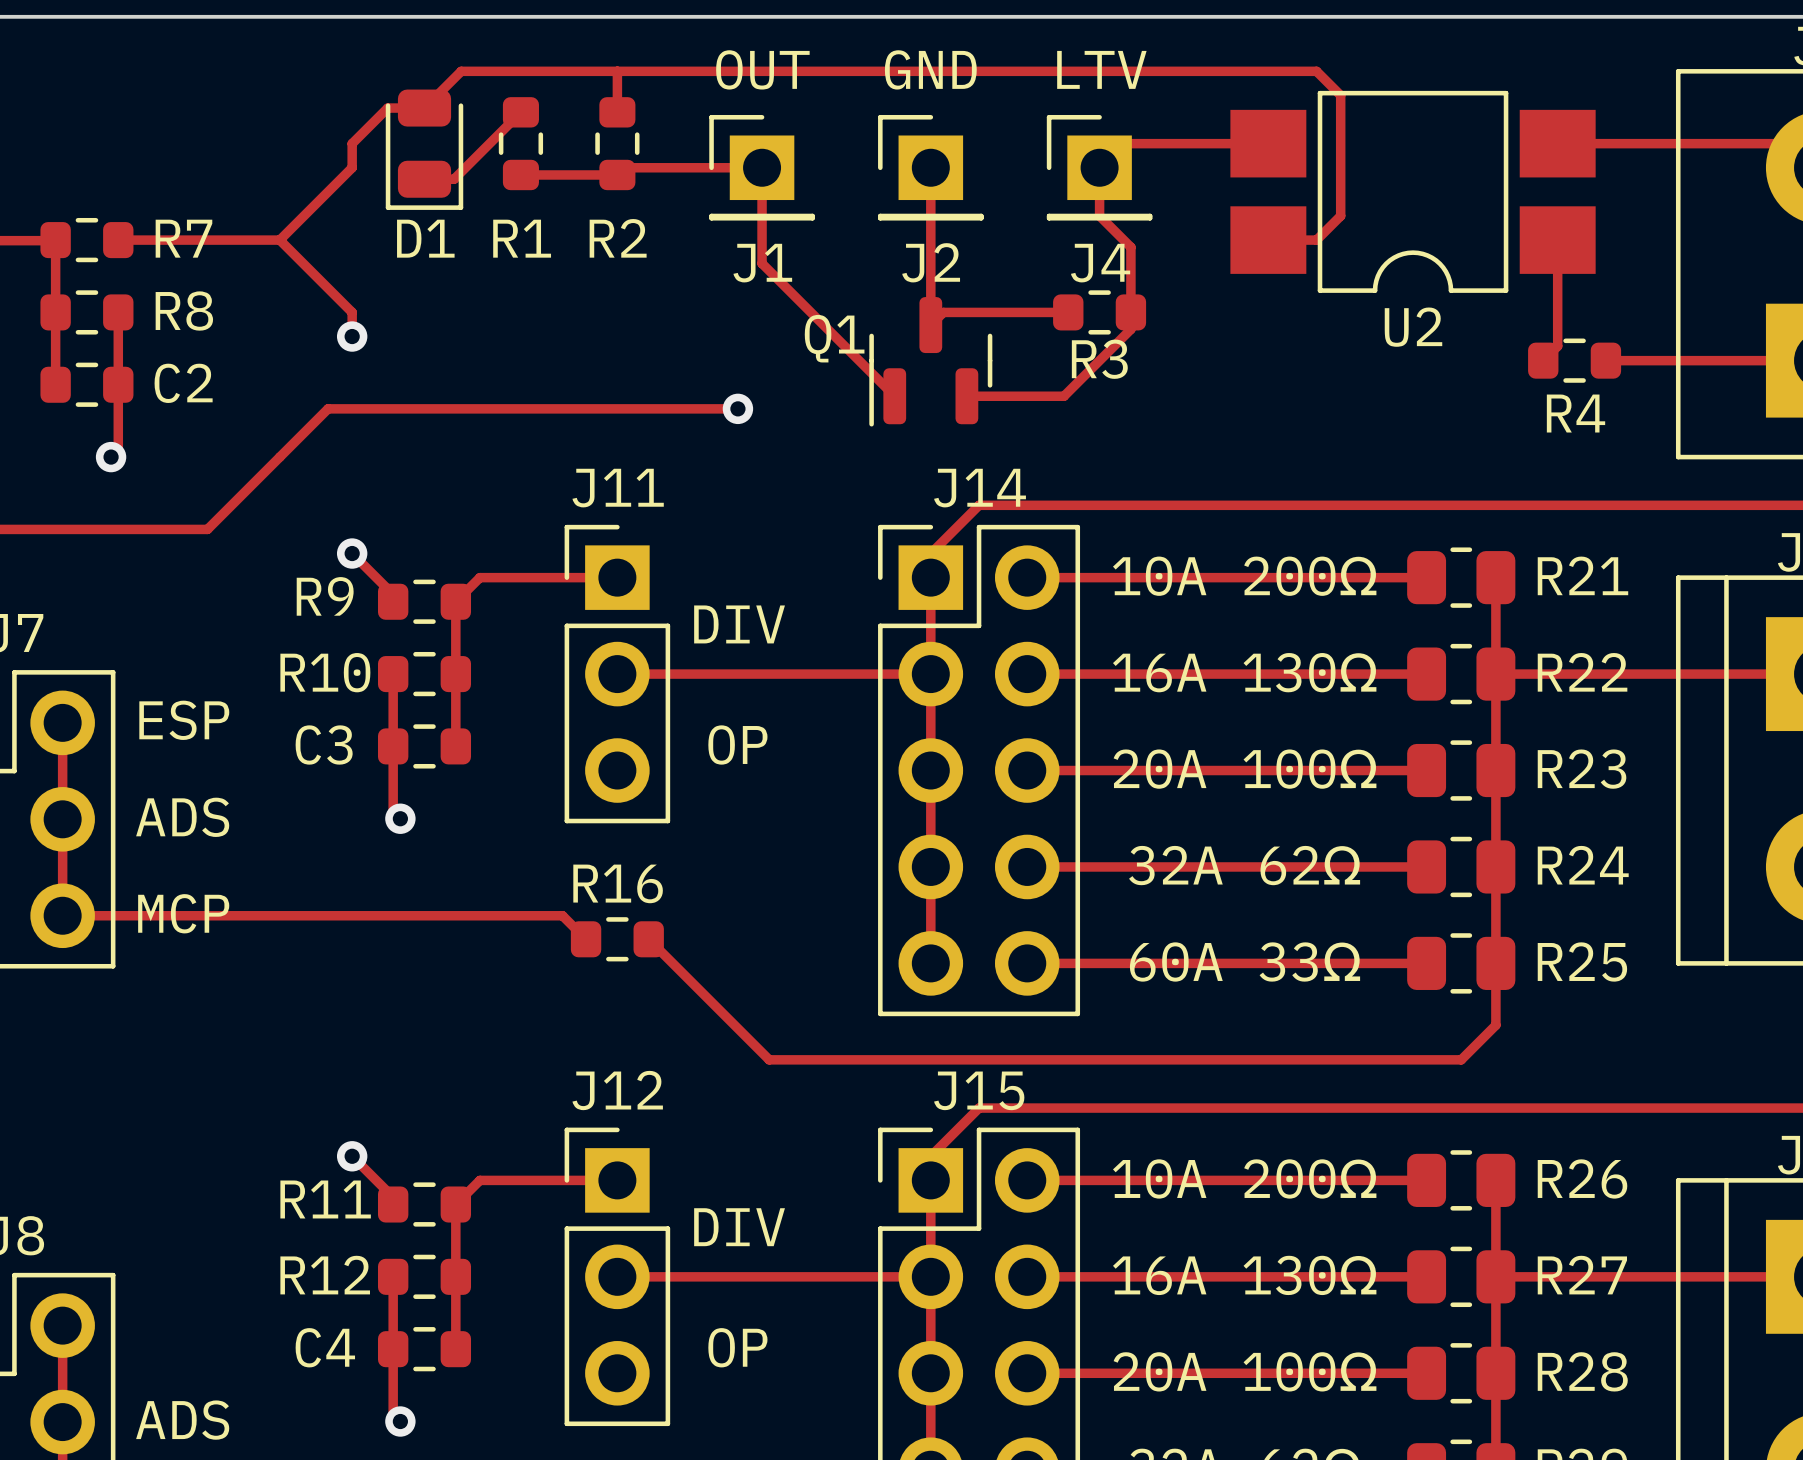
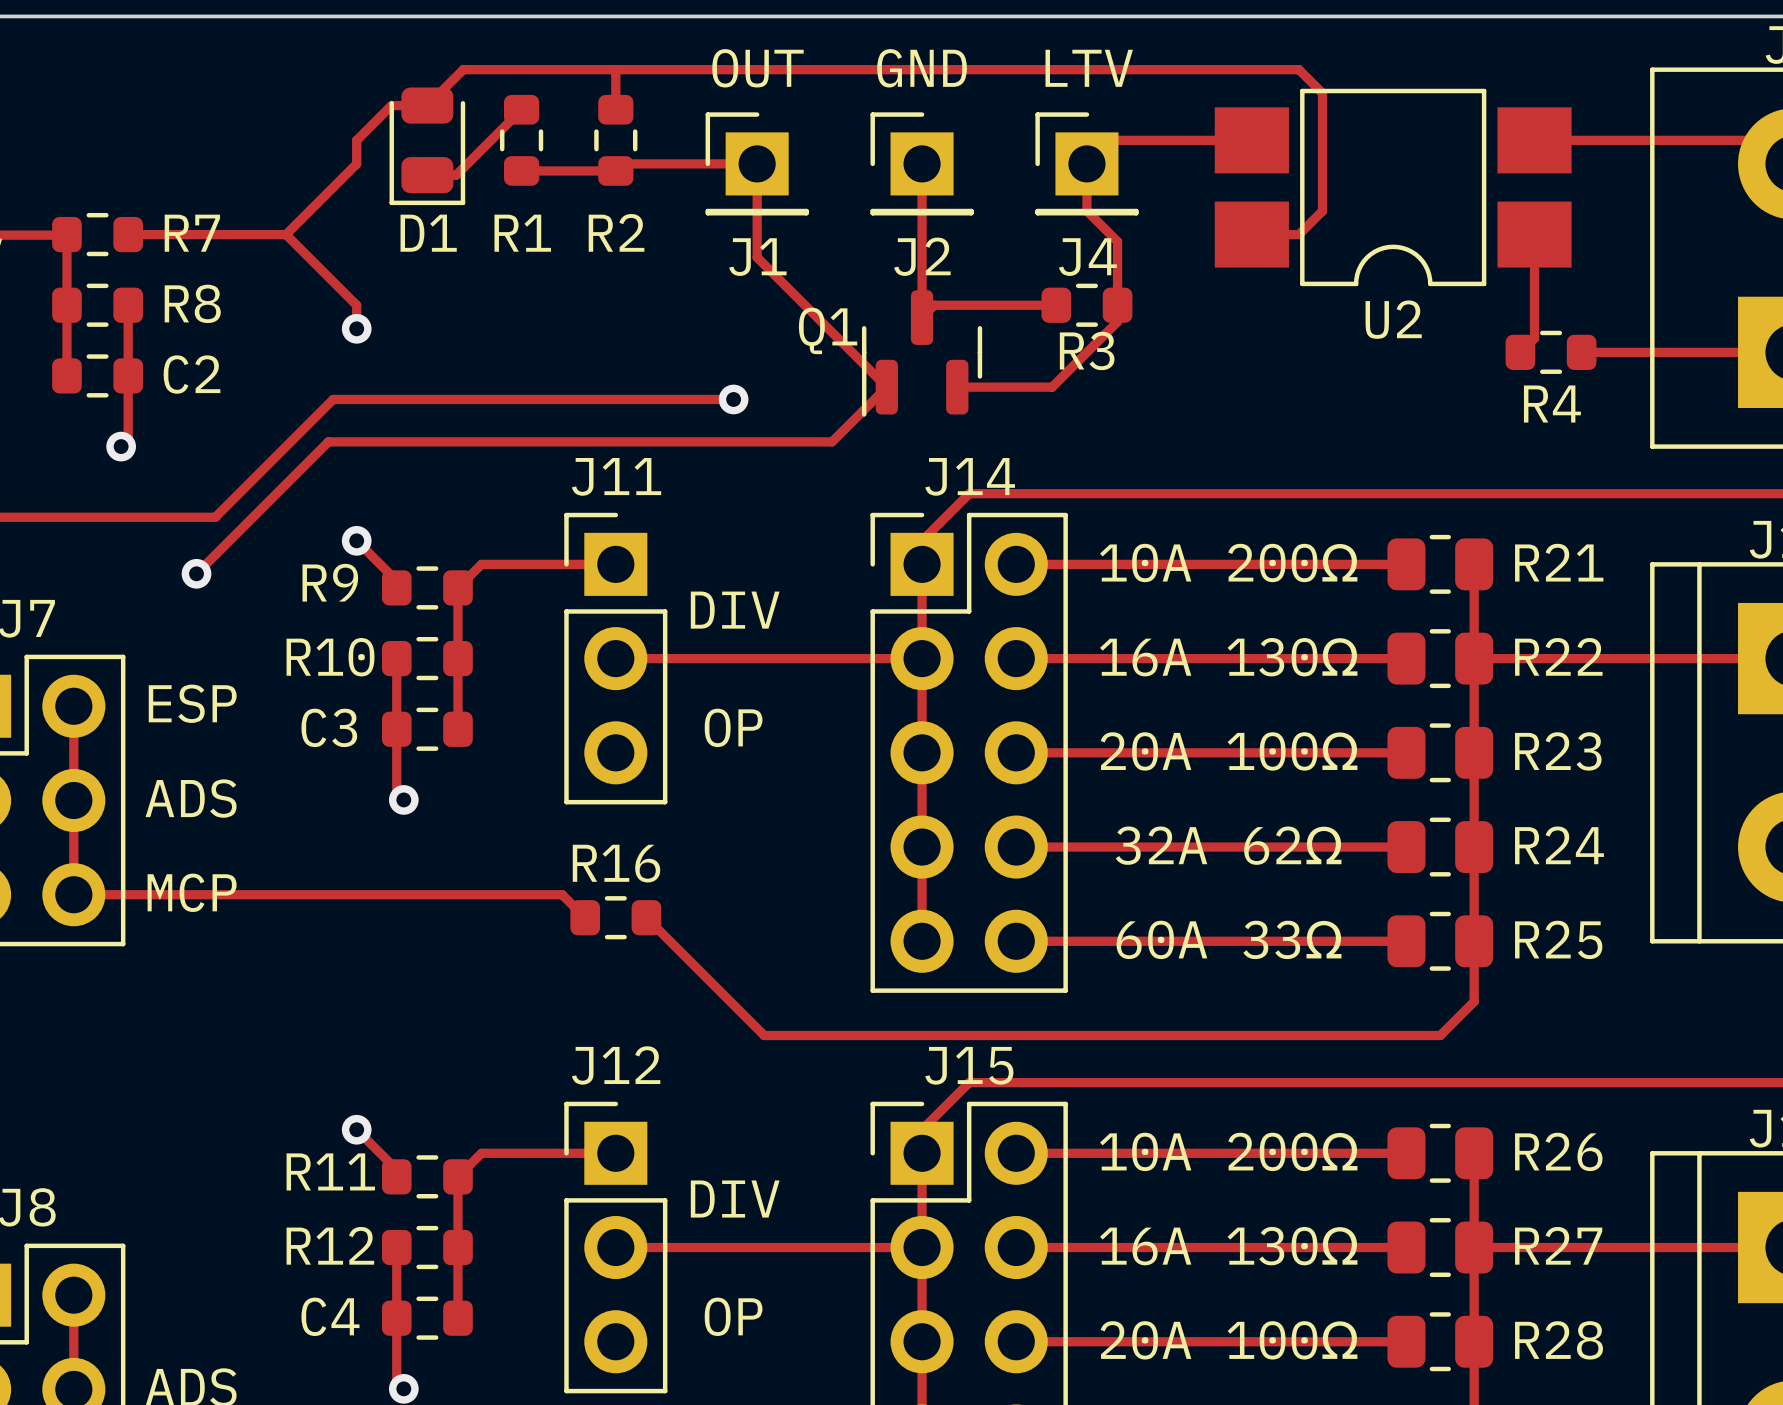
track: none -> (886, 387) (832, 441) (328, 441) (196, 573)
via: none -> (196, 573)

